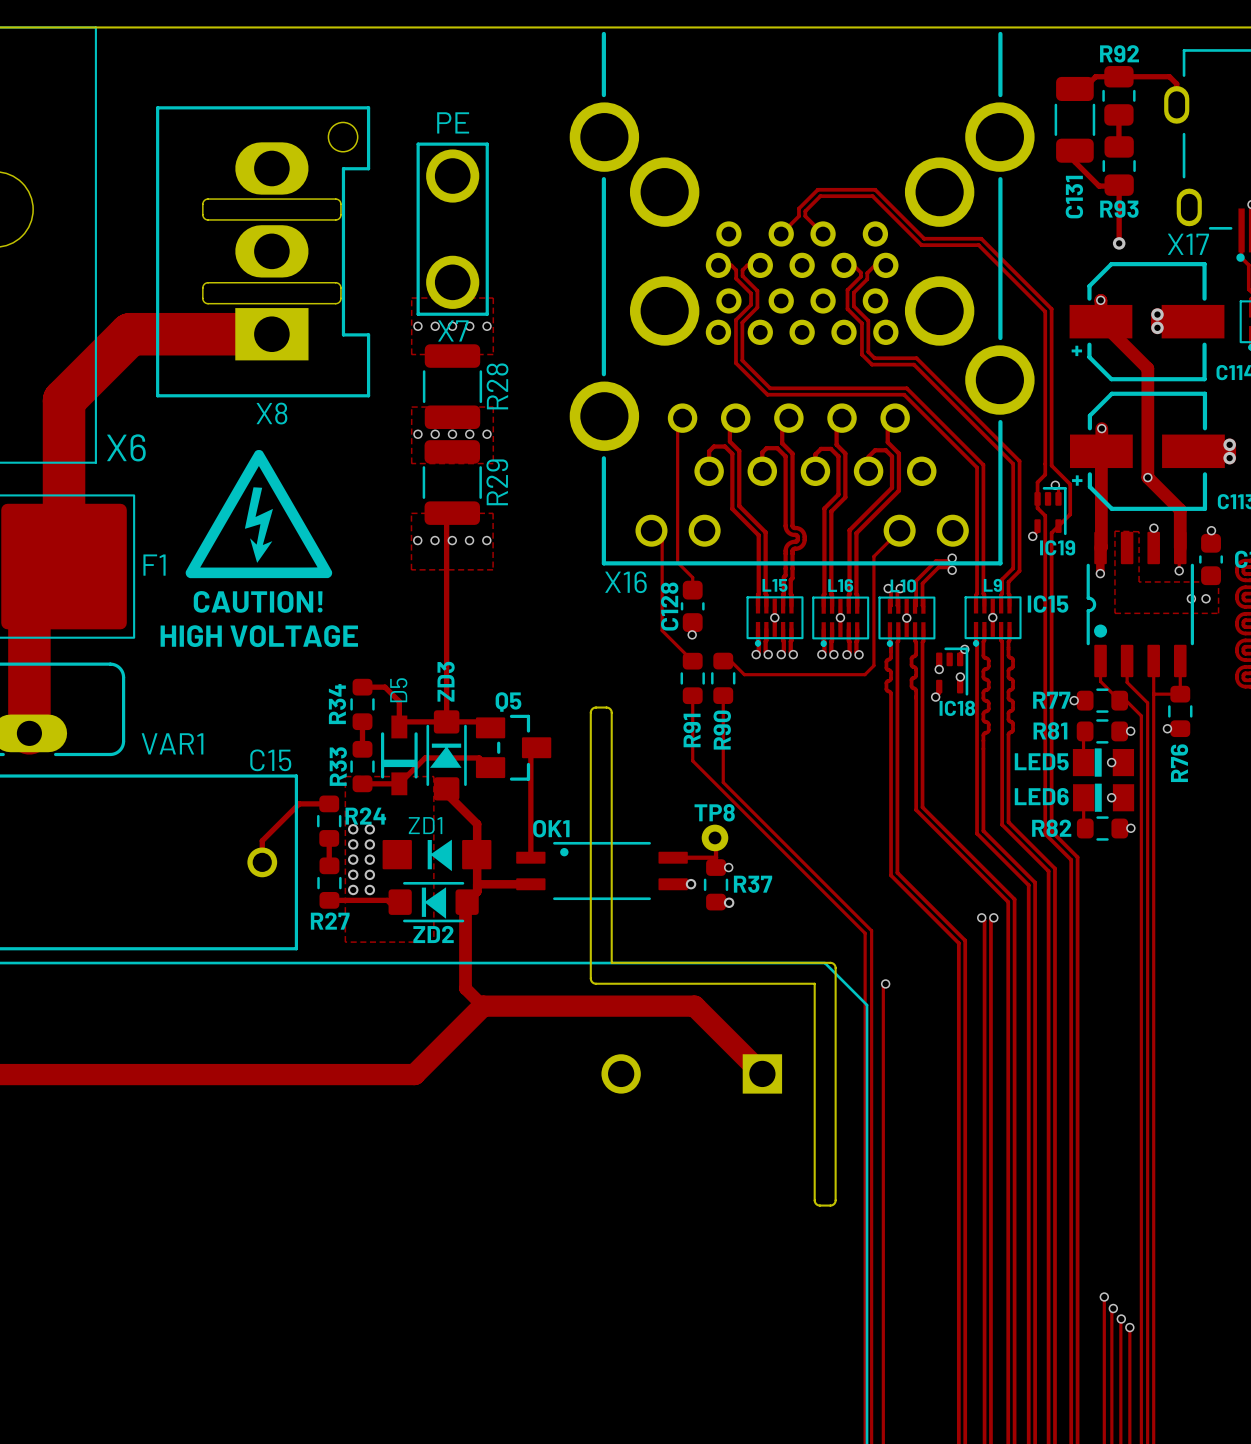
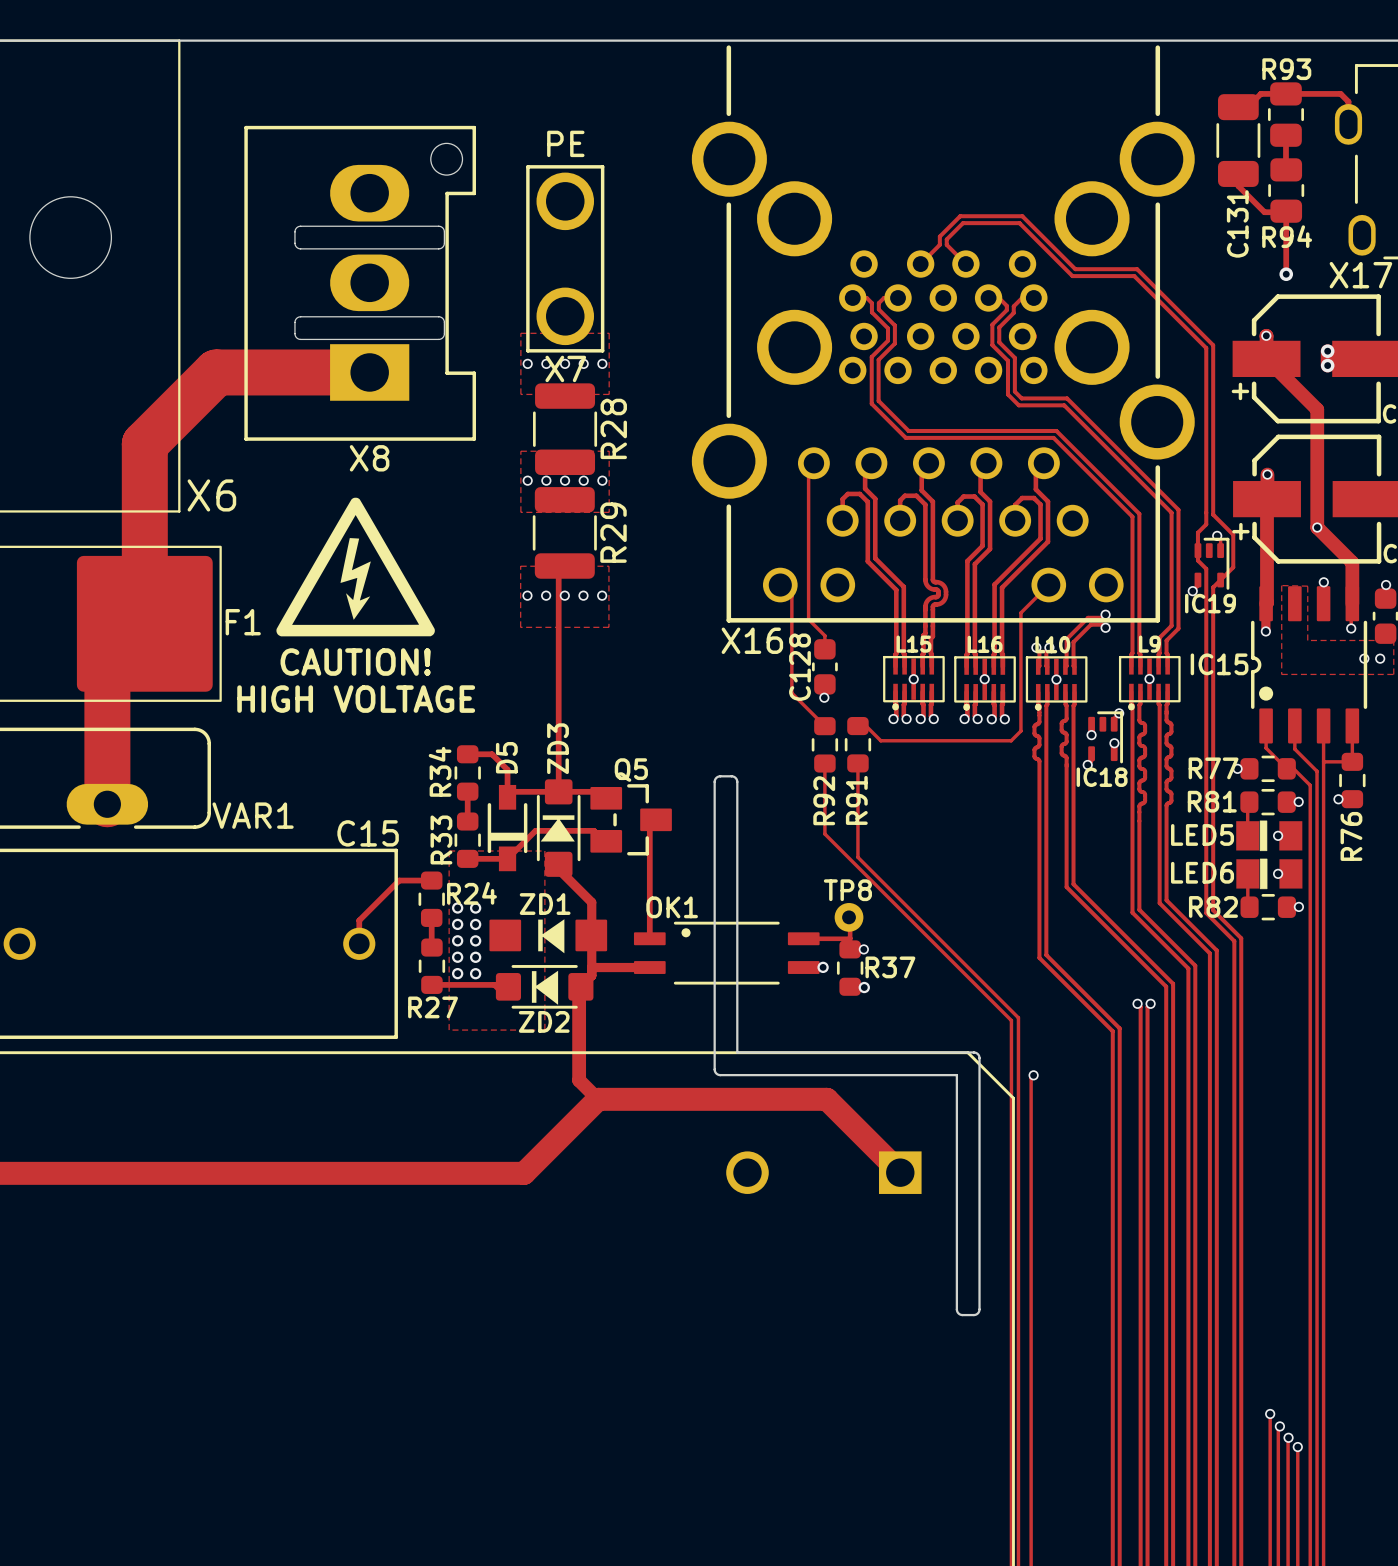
R92 name: R92 (1119, 53) -> R93 (1286, 69)
R93 name: R93 (1119, 209) -> R94 (1287, 236)
R91 name: R91 (692, 730) -> R92 (824, 800)
R90 name: R90 (722, 730) -> R91 (856, 800)

